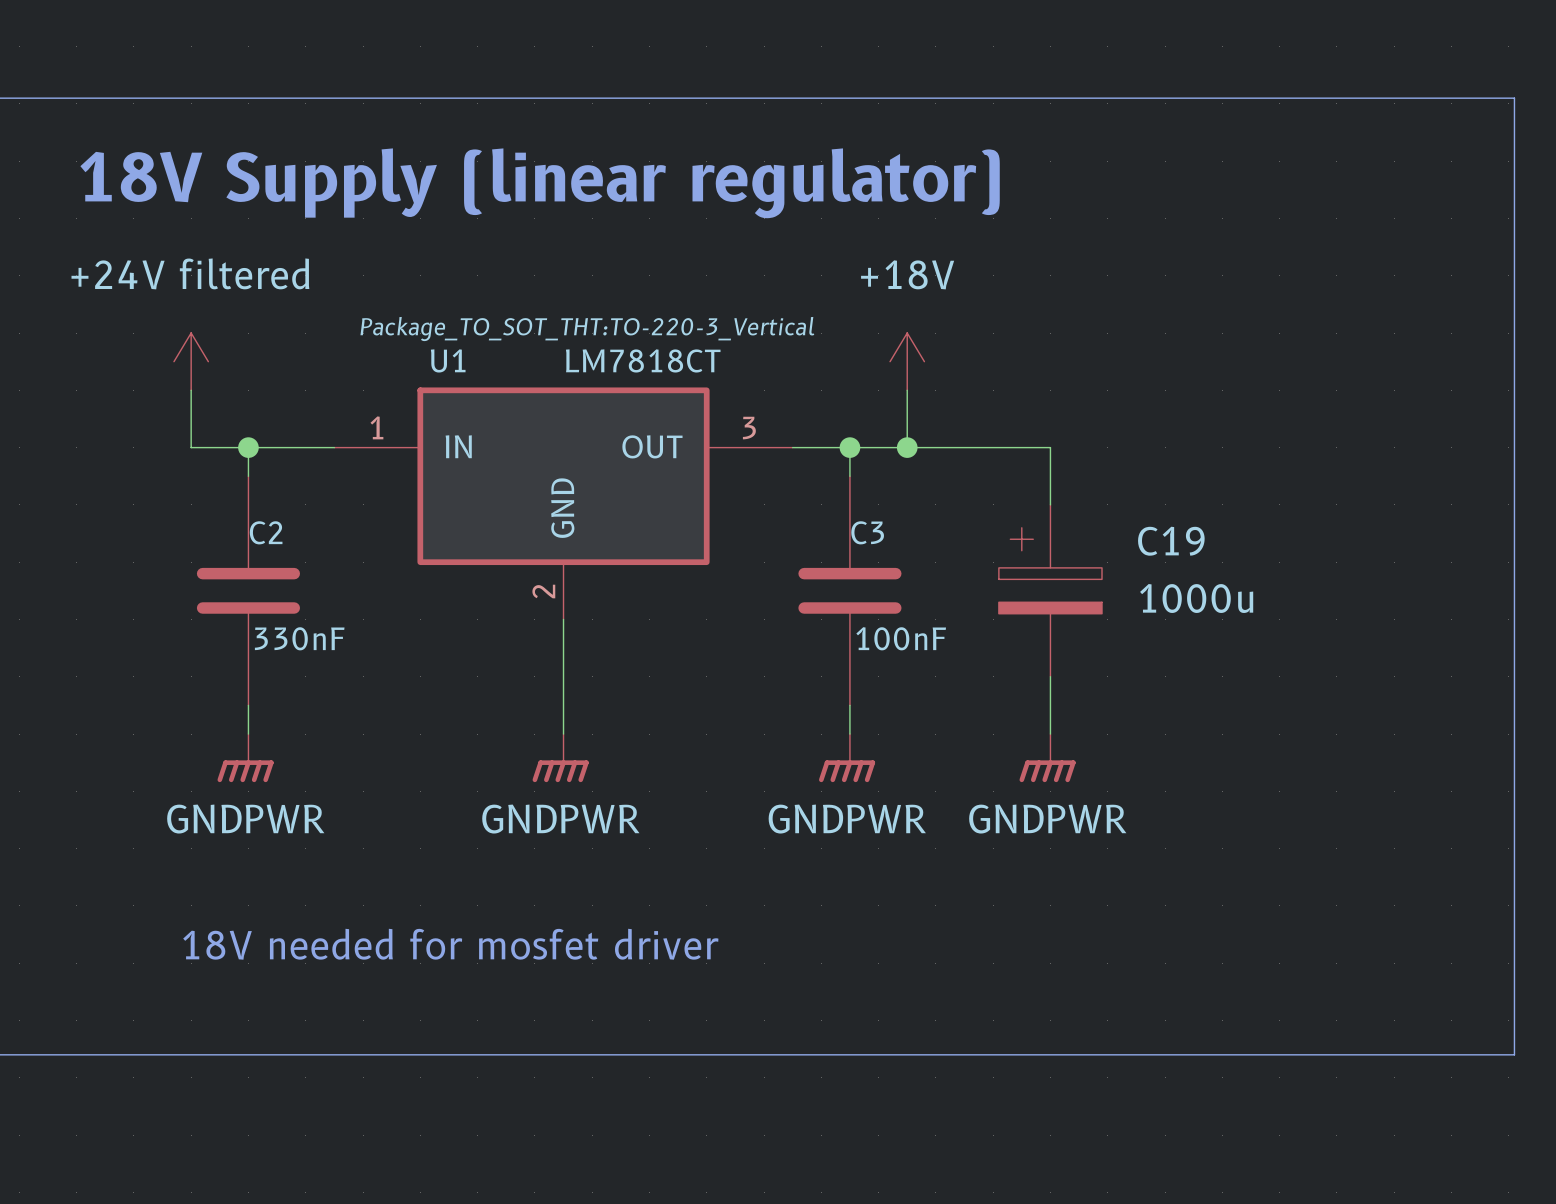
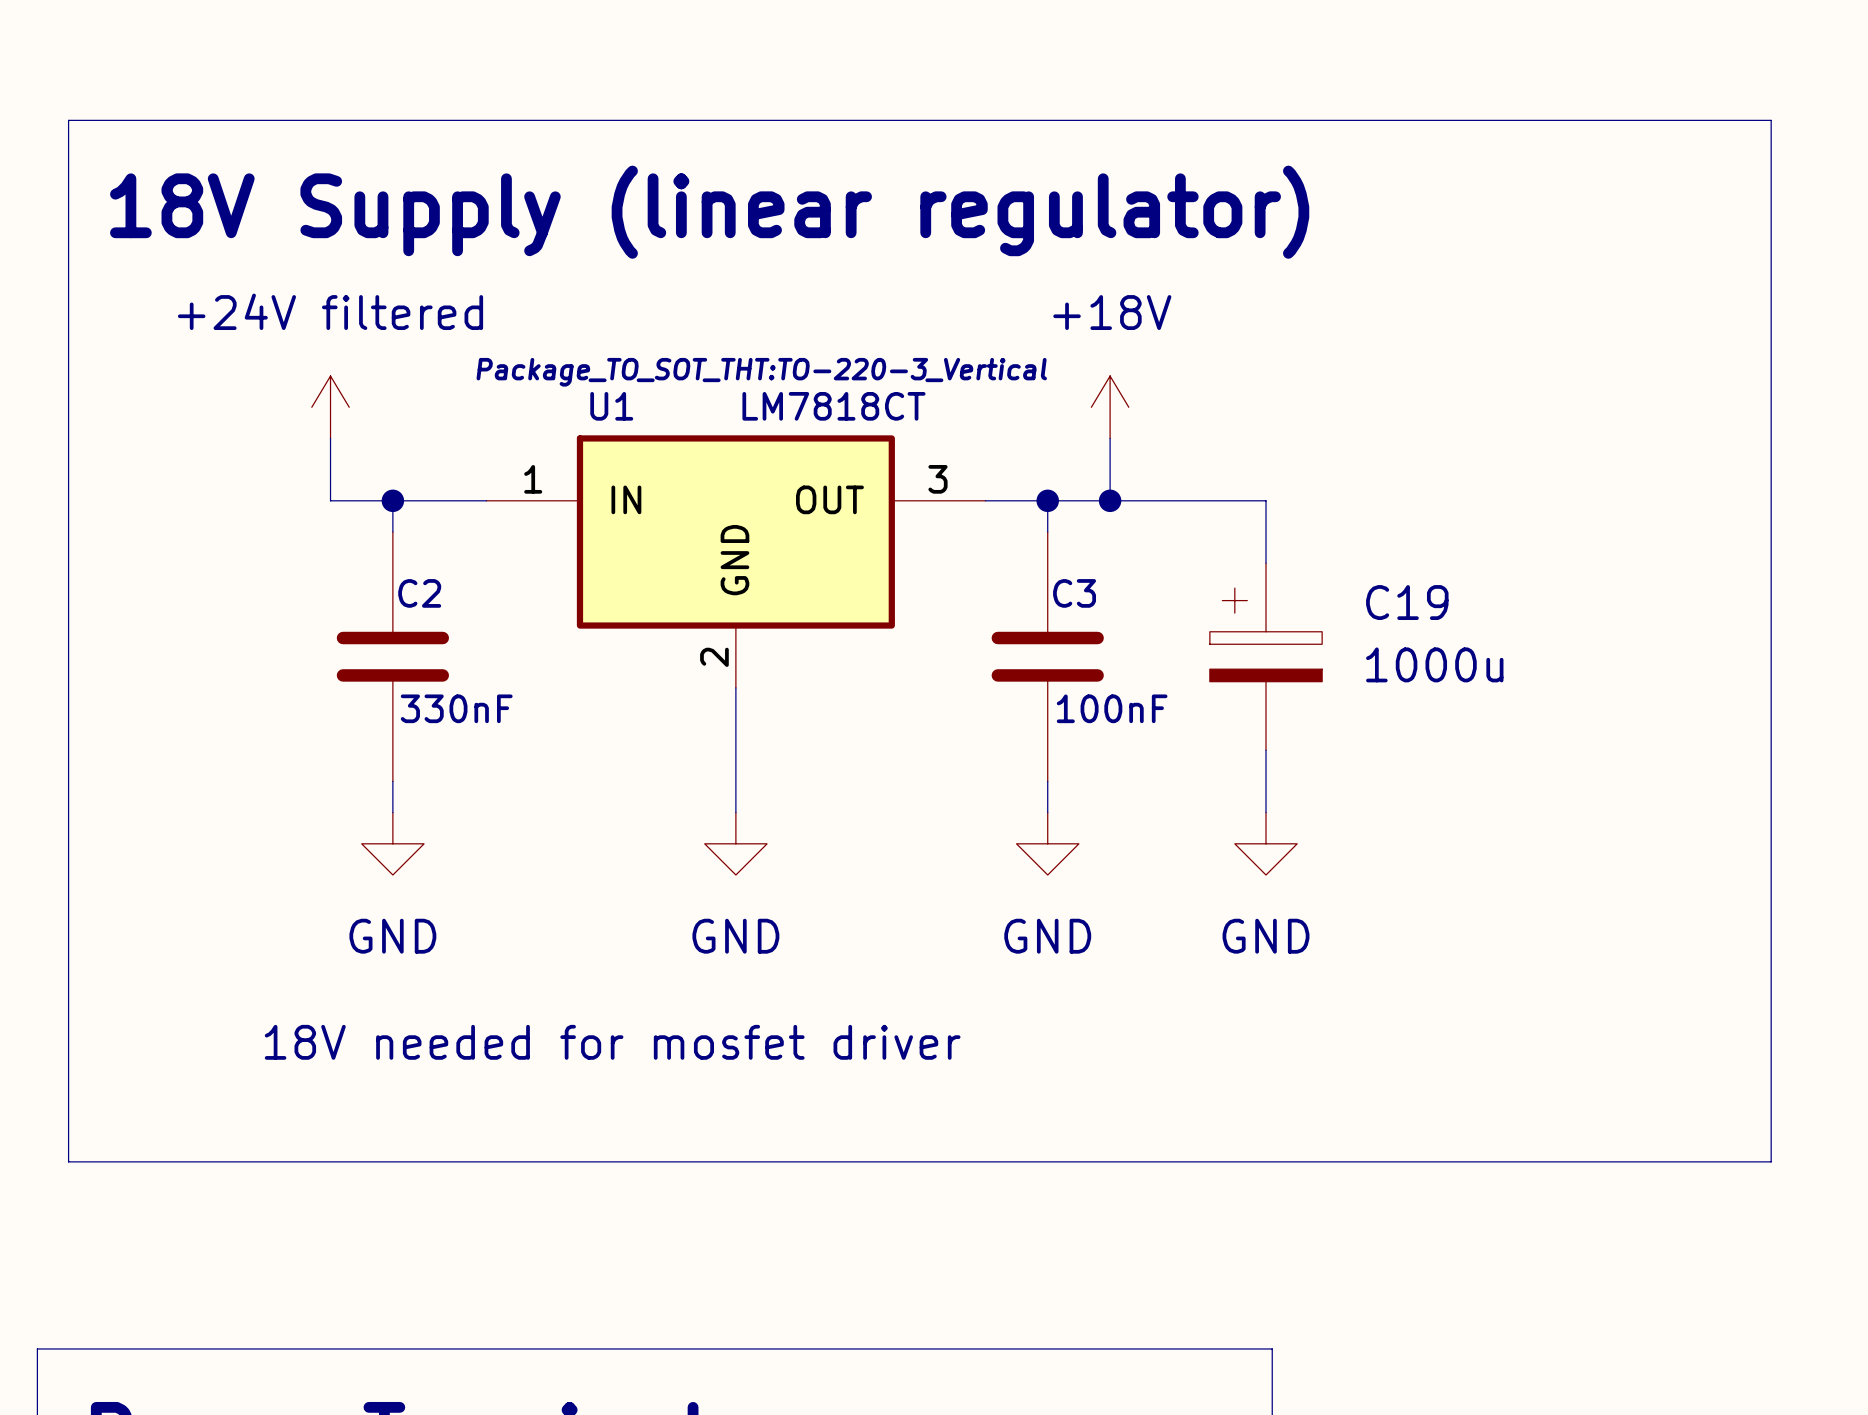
power symbol: GNDPWR (245, 758) -> GND (392, 843)
power symbol: GNDPWR (560, 758) -> GND (735, 843)
power symbol: GNDPWR (847, 758) -> GND (1047, 843)
power symbol: GNDPWR (1047, 758) -> GND (1266, 843)

